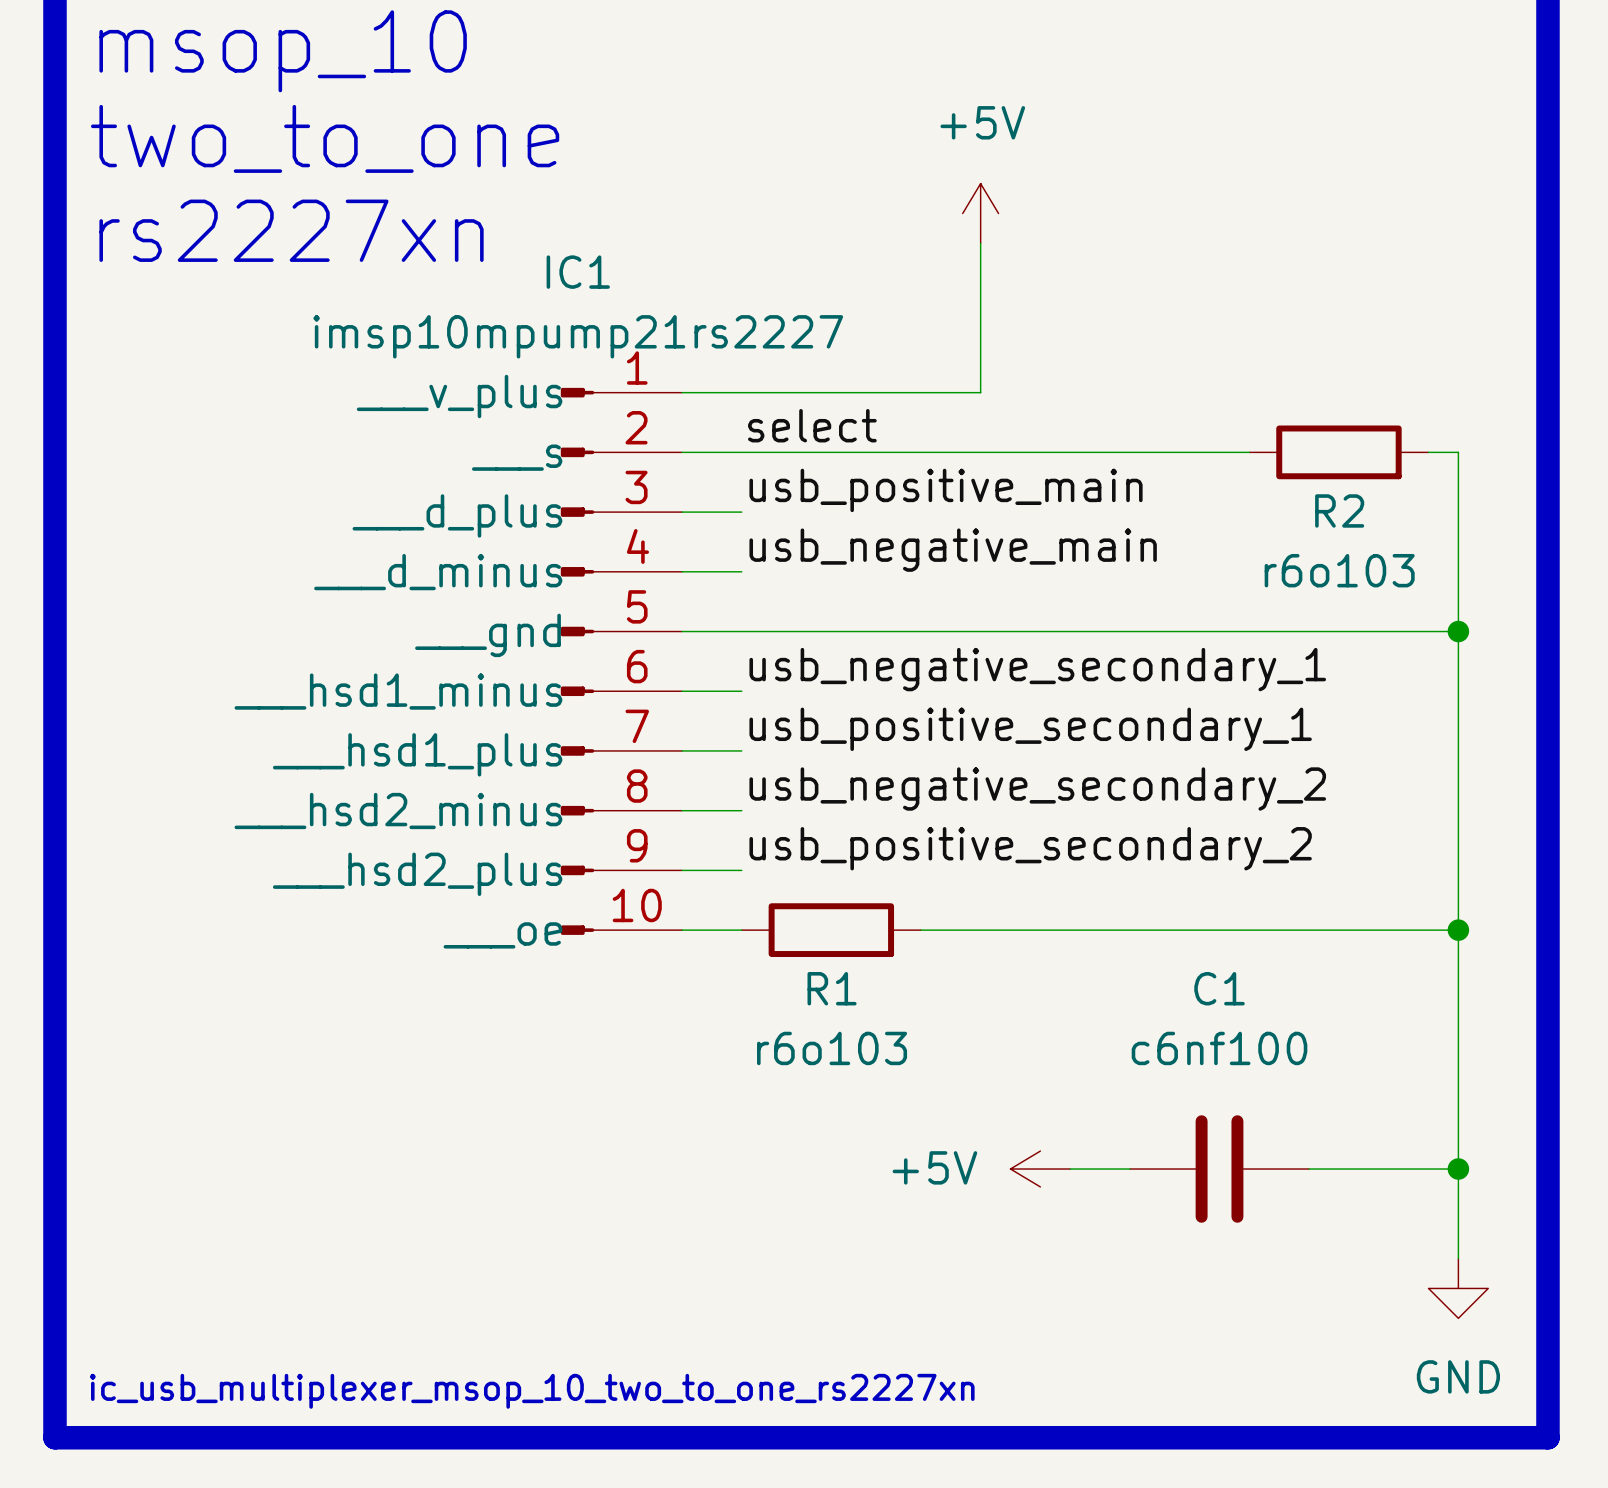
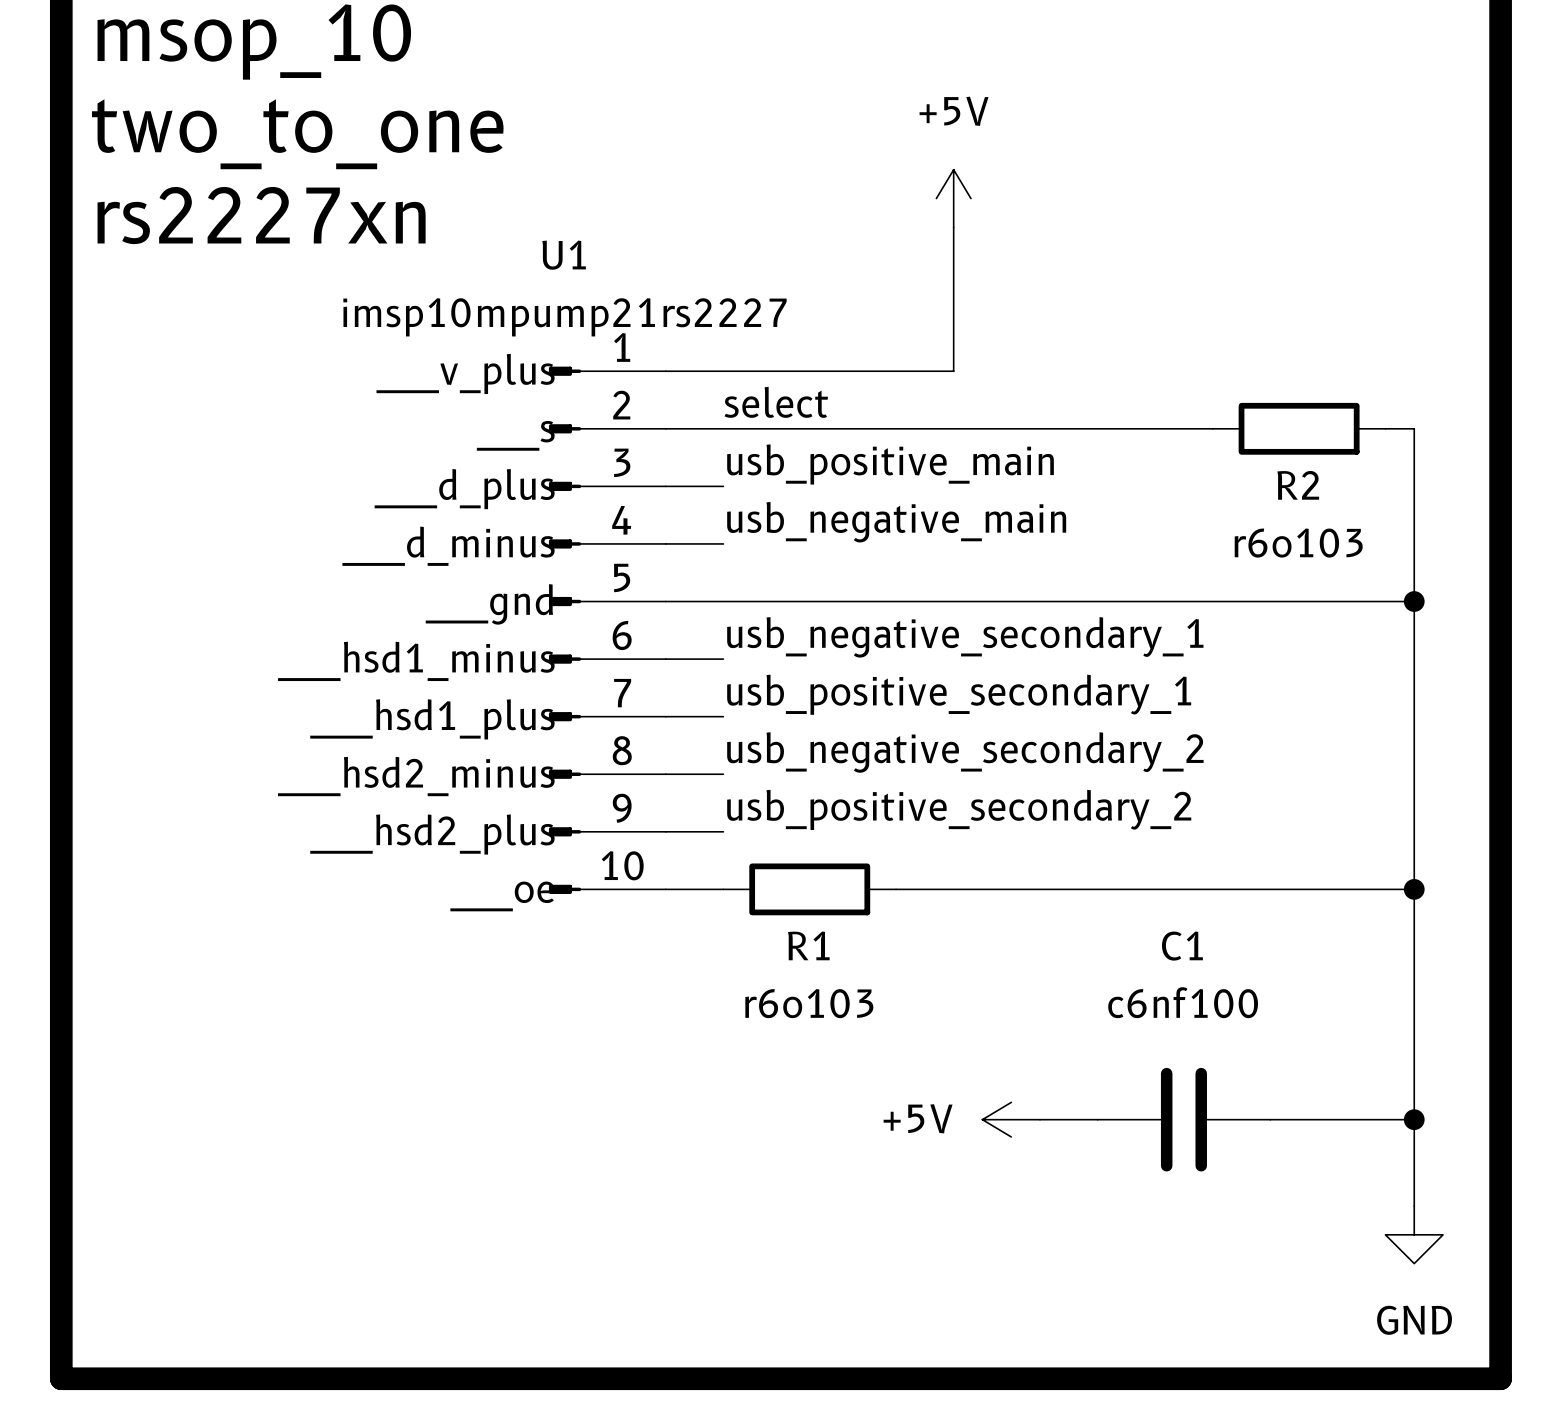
IC1 name: IC1 (578, 272) -> U1 (564, 255)
text: ic_usb_multiplexer_msop_10_two_to_one_rs2227xn (532, 1391) -> none

